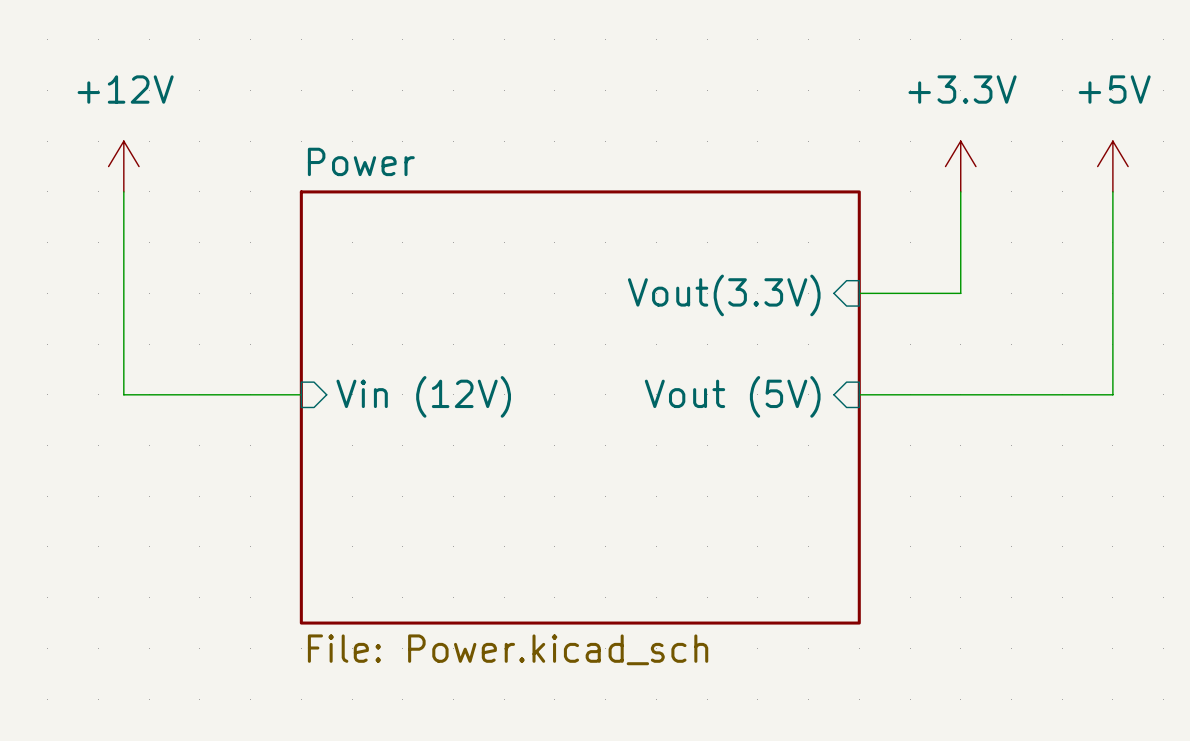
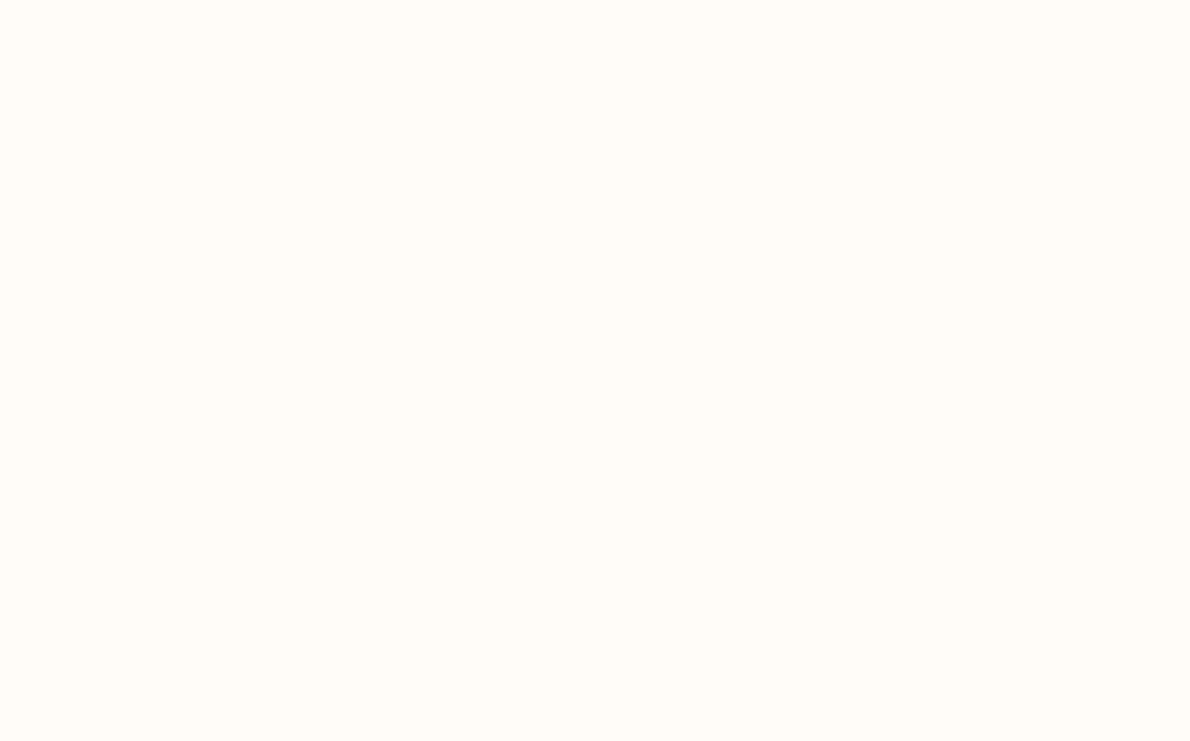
power symbol: +12V (123, 166) -> none
power symbol: +3.3V (960, 166) -> none
power symbol: +5V (1112, 166) -> none
wire: (123, 191) (123, 394) (301, 394) -> none
wire: (960, 191) (960, 293) (859, 293) -> none
wire: (1112, 191) (1112, 394) (859, 394) -> none
sheet pin: Vout(3.3V) (724, 295) -> none
sheet pin: Vin (12V) (423, 396) -> none
sheet pin: Vout (5V) (732, 396) -> none
sheet Power: File: Power.kicad_sch (580, 407) -> none

